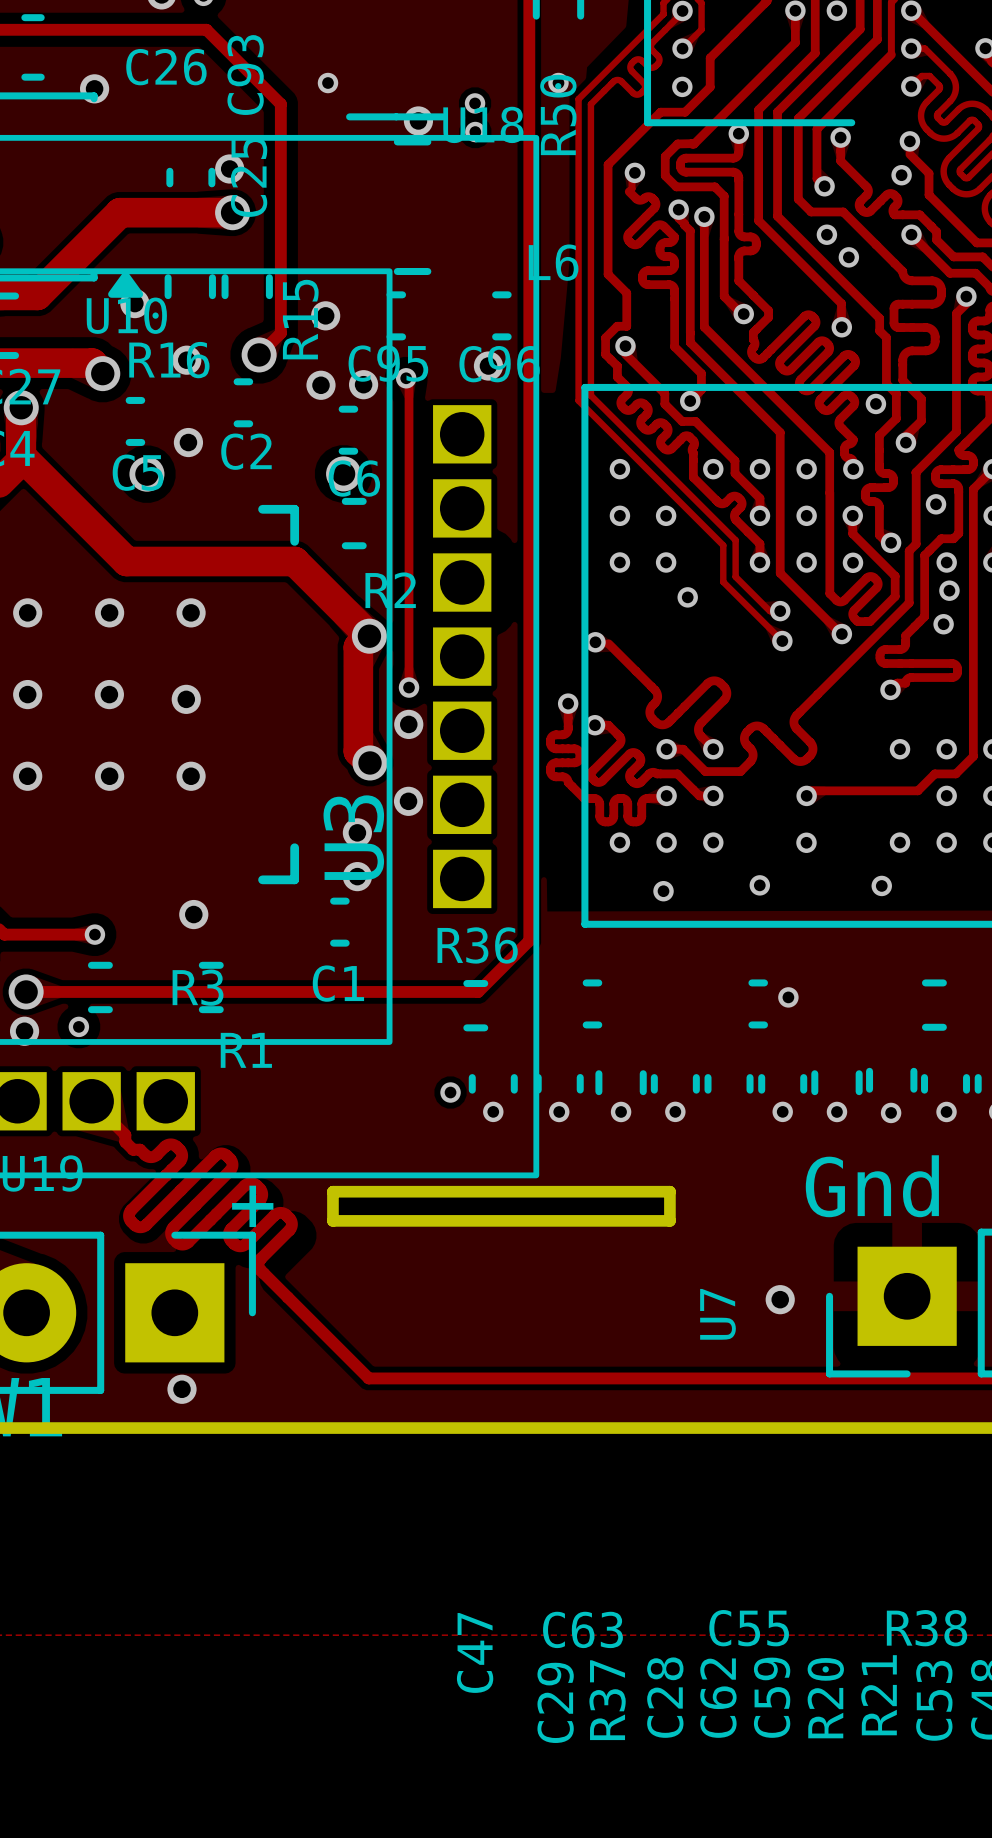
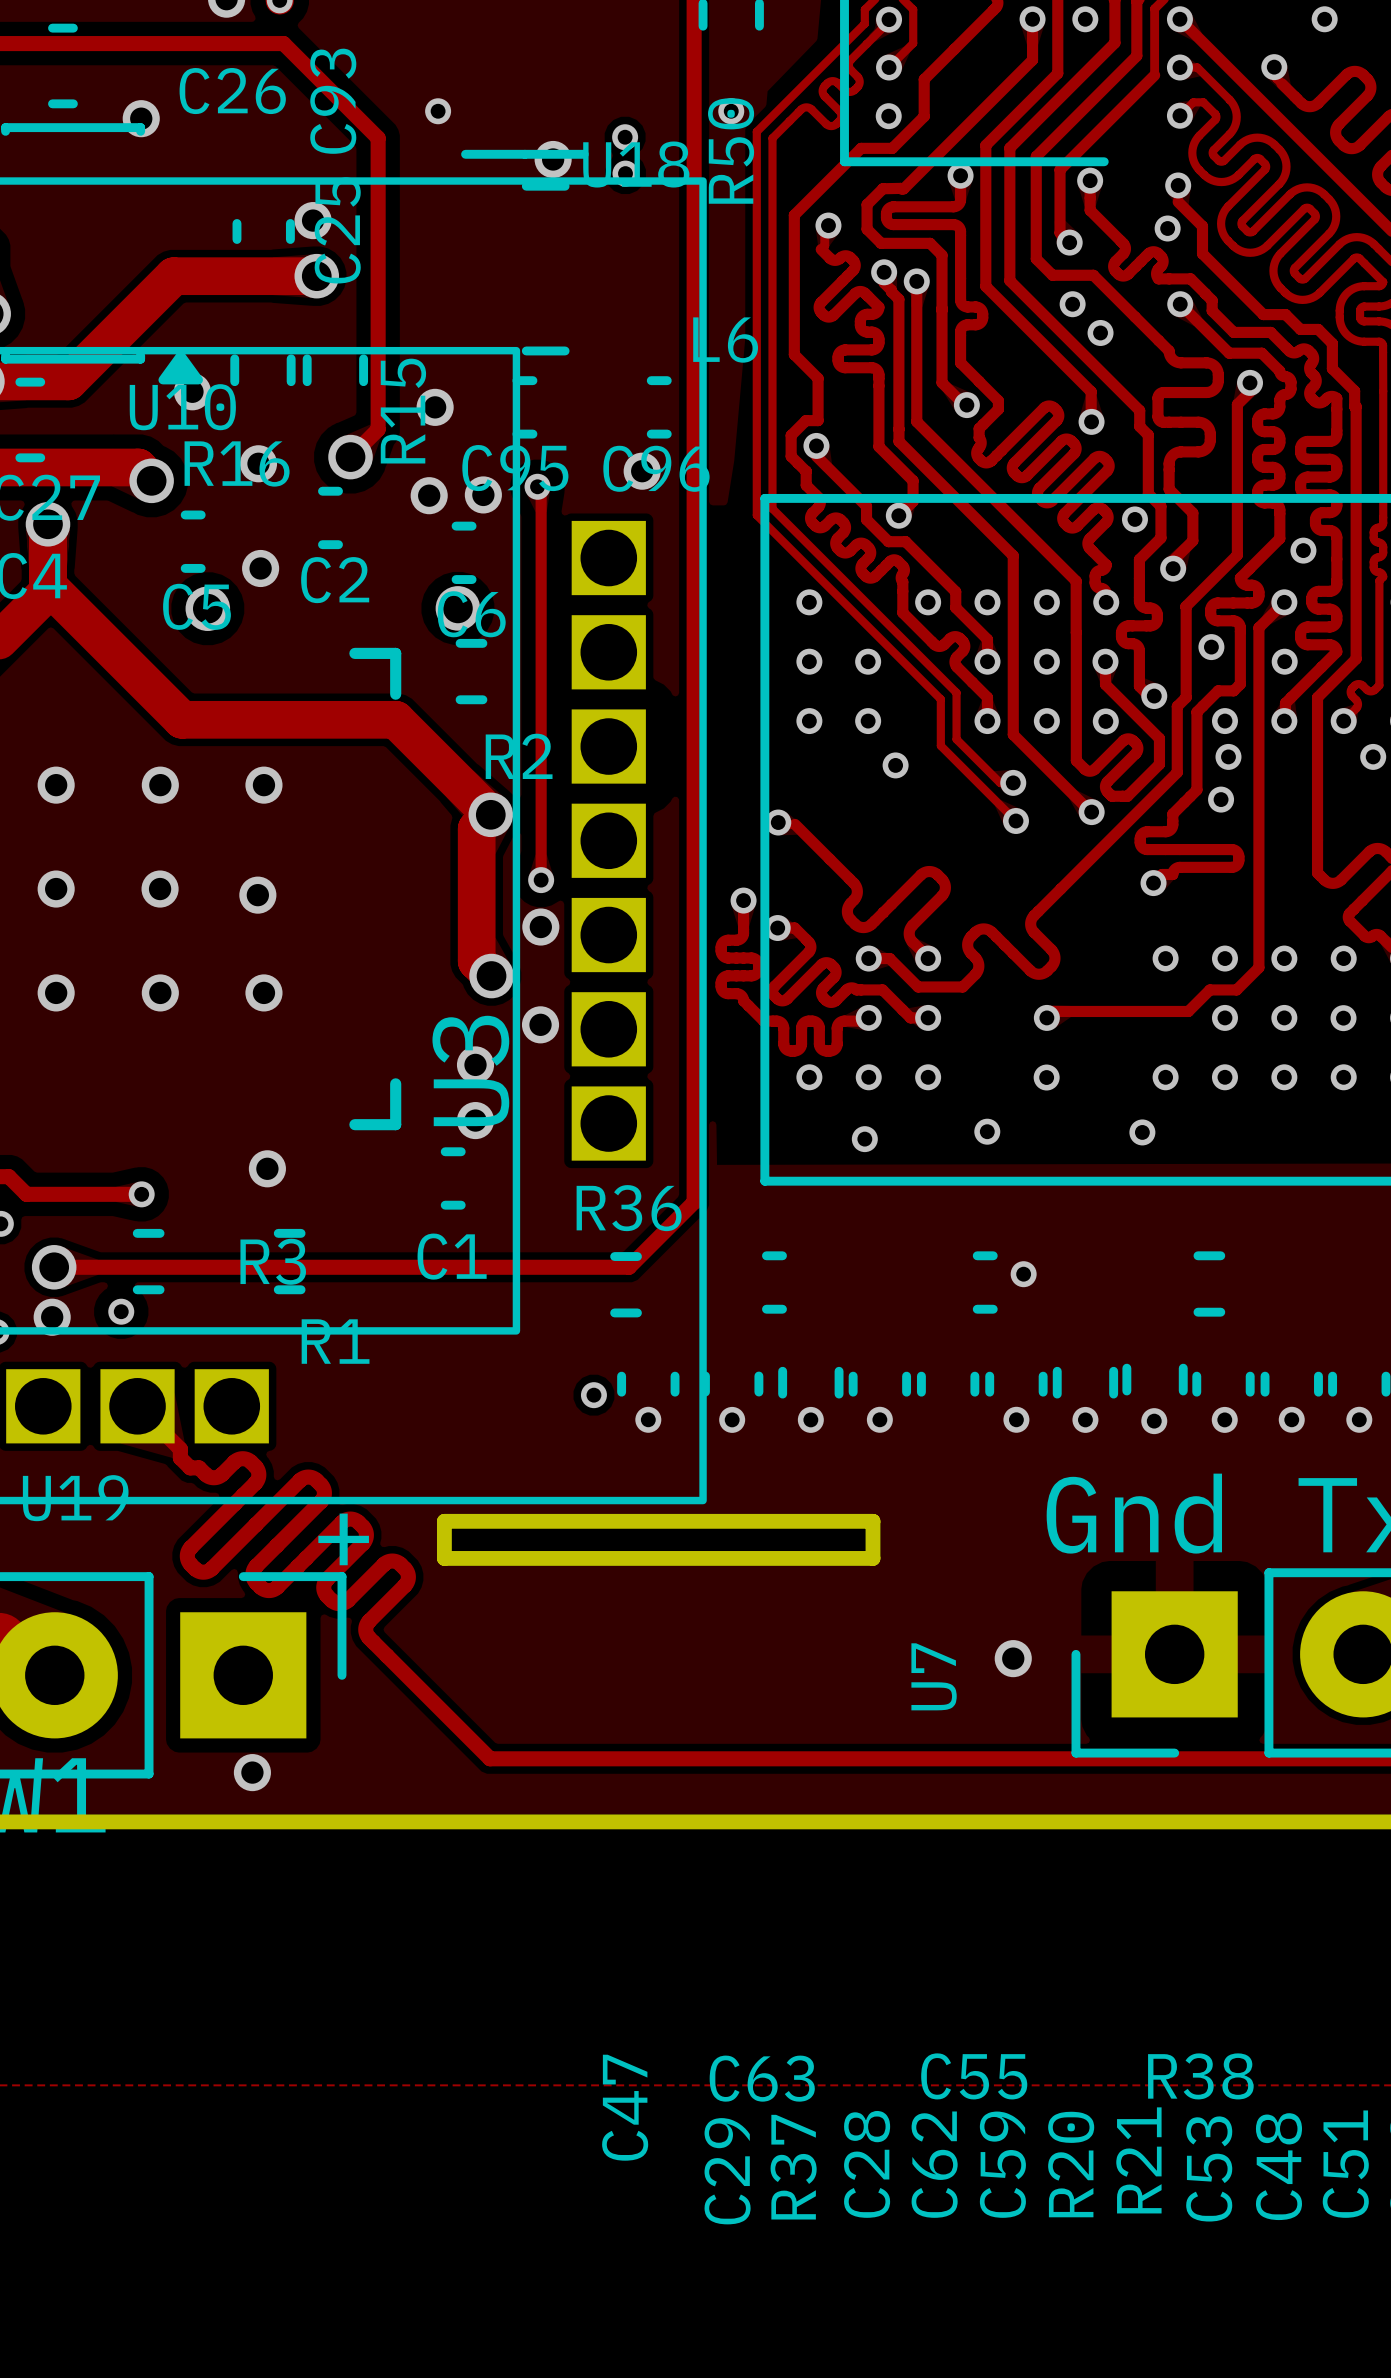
track: (145, 1154) (153, 1156) (165, 1146) (170, 1144) (179, 1149) (182, 1155) (179, 1161) (130, 1211) (129, 1219) (137, 1226) (146, 1224) (215, 1155) (220, 1153) (225, 1154) (230, 1159) (231, 1168) (172, 1228) (171, 1235) (176, 1242) (181, 1244) (187, 1242) (248, 1183) (256, 1185) (261, 1191) (261, 1196) (229, 1230) (229, 1238) (234, 1244) (240, 1246) (245, 1244) (276, 1214) (281, 1212) (286, 1215) (291, 1222) (290, 1228) (260, 1258) (258, 1263) (260, 1269) (273, 1283) -> (205, 1474) (211, 1477) (219, 1476) (235, 1461) (242, 1458) (251, 1462) (257, 1468) (258, 1474) (255, 1483) (189, 1549) (188, 1561) (199, 1571) (210, 1569) (299, 1480) (305, 1477) (312, 1477) (320, 1484) (324, 1490) (323, 1497) (254, 1568) (253, 1578) (261, 1587) (268, 1590) (276, 1587) (344, 1520) (353, 1519) (362, 1526) (366, 1533) (365, 1540) (325, 1581) (323, 1588) (327, 1596) (335, 1603) (346, 1601) (383, 1564) (389, 1561) (399, 1563) (408, 1575) (405, 1584) (367, 1623) (365, 1630) (369, 1637)

